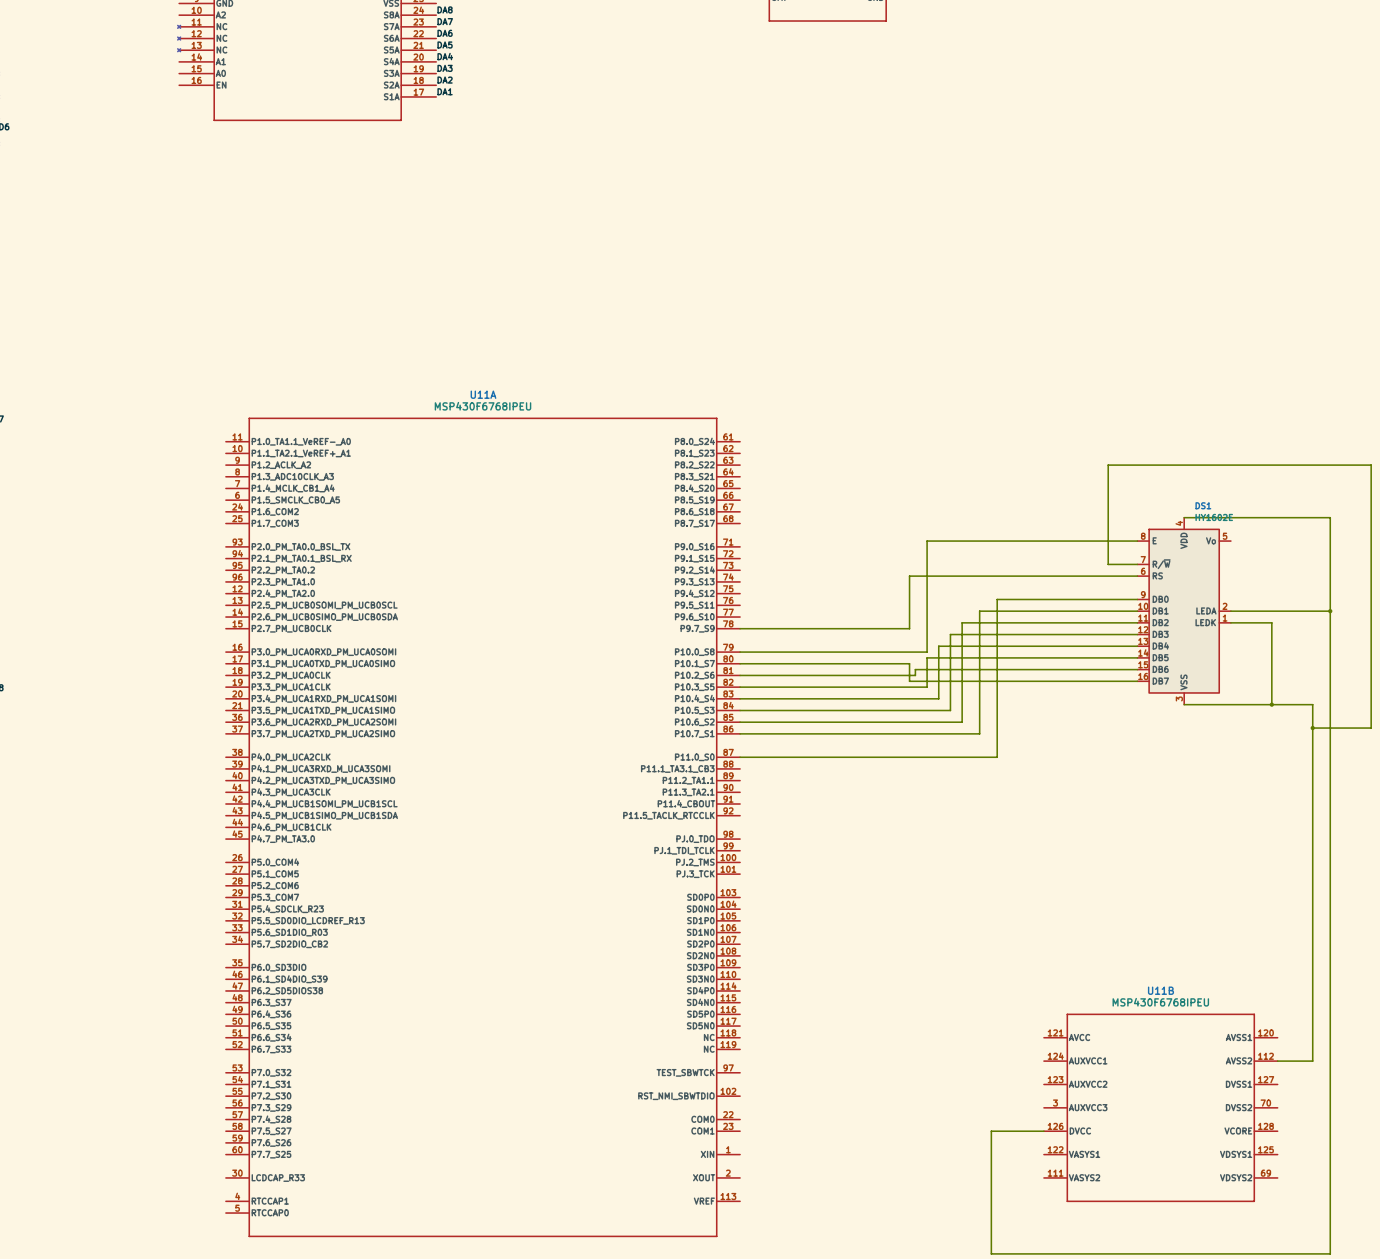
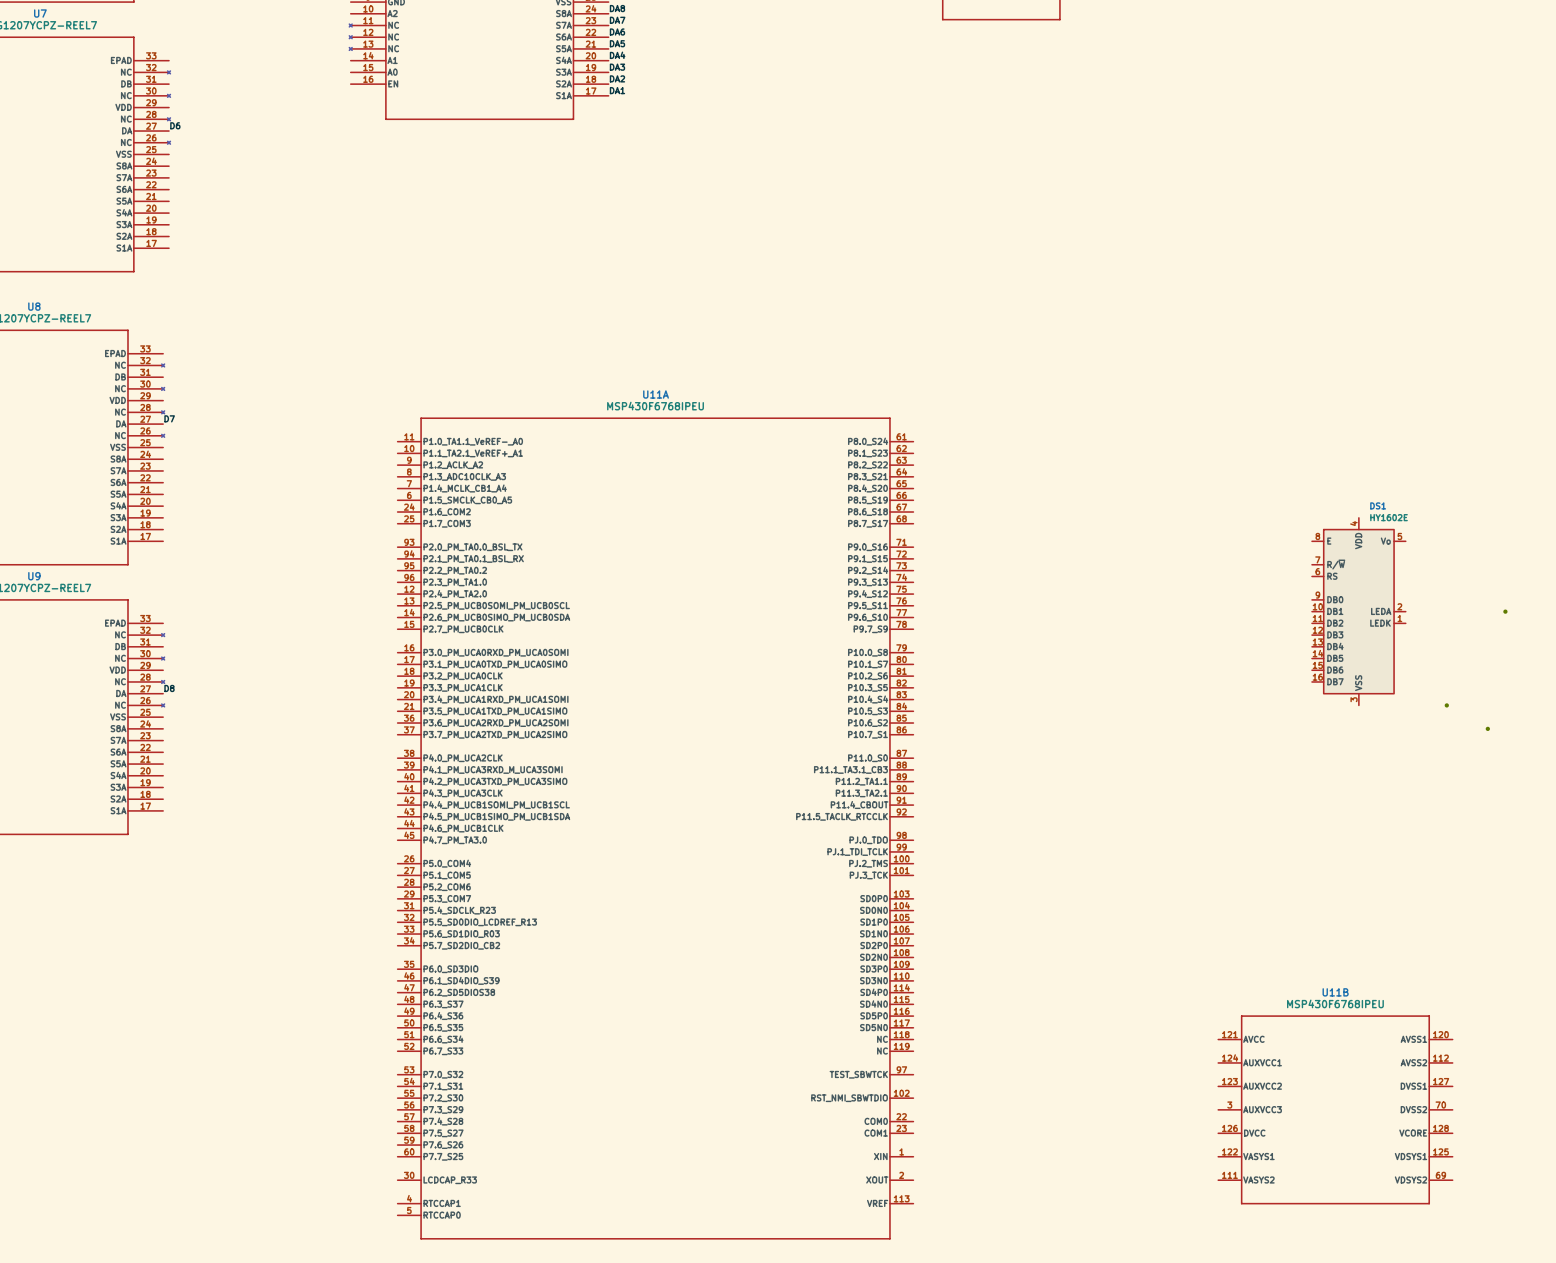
wire: (1184, 517) (1330, 517) (1330, 1253) (991, 1253) (991, 1131) (1043, 1131) -> none
wire: (1137, 541) (927, 541) (927, 652) (740, 652) -> none
wire: (1137, 564) (1108, 564) (1108, 465) (1371, 465) (1371, 728) (1312, 728) -> none
wire: (1137, 576) (909, 576) (909, 628) (740, 628) -> none
wire: (1137, 599) (997, 599) (997, 757) (740, 757) -> none
wire: (1137, 611) (979, 611) (979, 733) (740, 733) -> none
wire: (1230, 611) (1330, 611) -> none
wire: (1137, 622) (962, 622) (962, 722) (740, 722) -> none
wire: (1230, 622) (1271, 622) (1271, 704) -> none
wire: (1137, 634) (950, 634) (950, 710) (740, 710) -> none
wire: (1137, 646) (938, 646) (938, 698) (740, 698) -> none
wire: (1137, 657) (927, 657) (927, 687) (740, 687) -> none
wire: (740, 663) (909, 663) (909, 681) (1137, 681) -> none
wire: (1137, 669) (915, 669) (915, 675) (740, 675) -> none
wire: (1184, 704) (1312, 704) (1312, 1061) (1277, 1061) -> none

